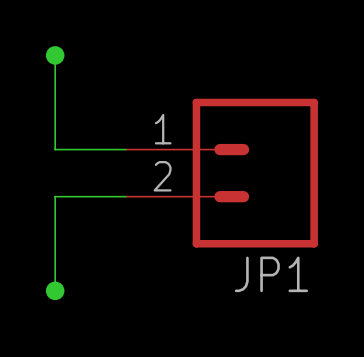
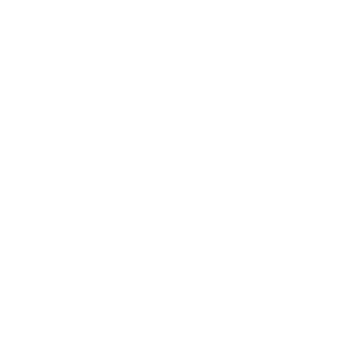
wire: (55, 55) (55, 149) (125, 149) -> none
junction: (55, 55) -> none
JP1: (221, 173) -> none
wire: (125, 196) (55, 196) (55, 290) -> none
junction: (55, 290) -> none

